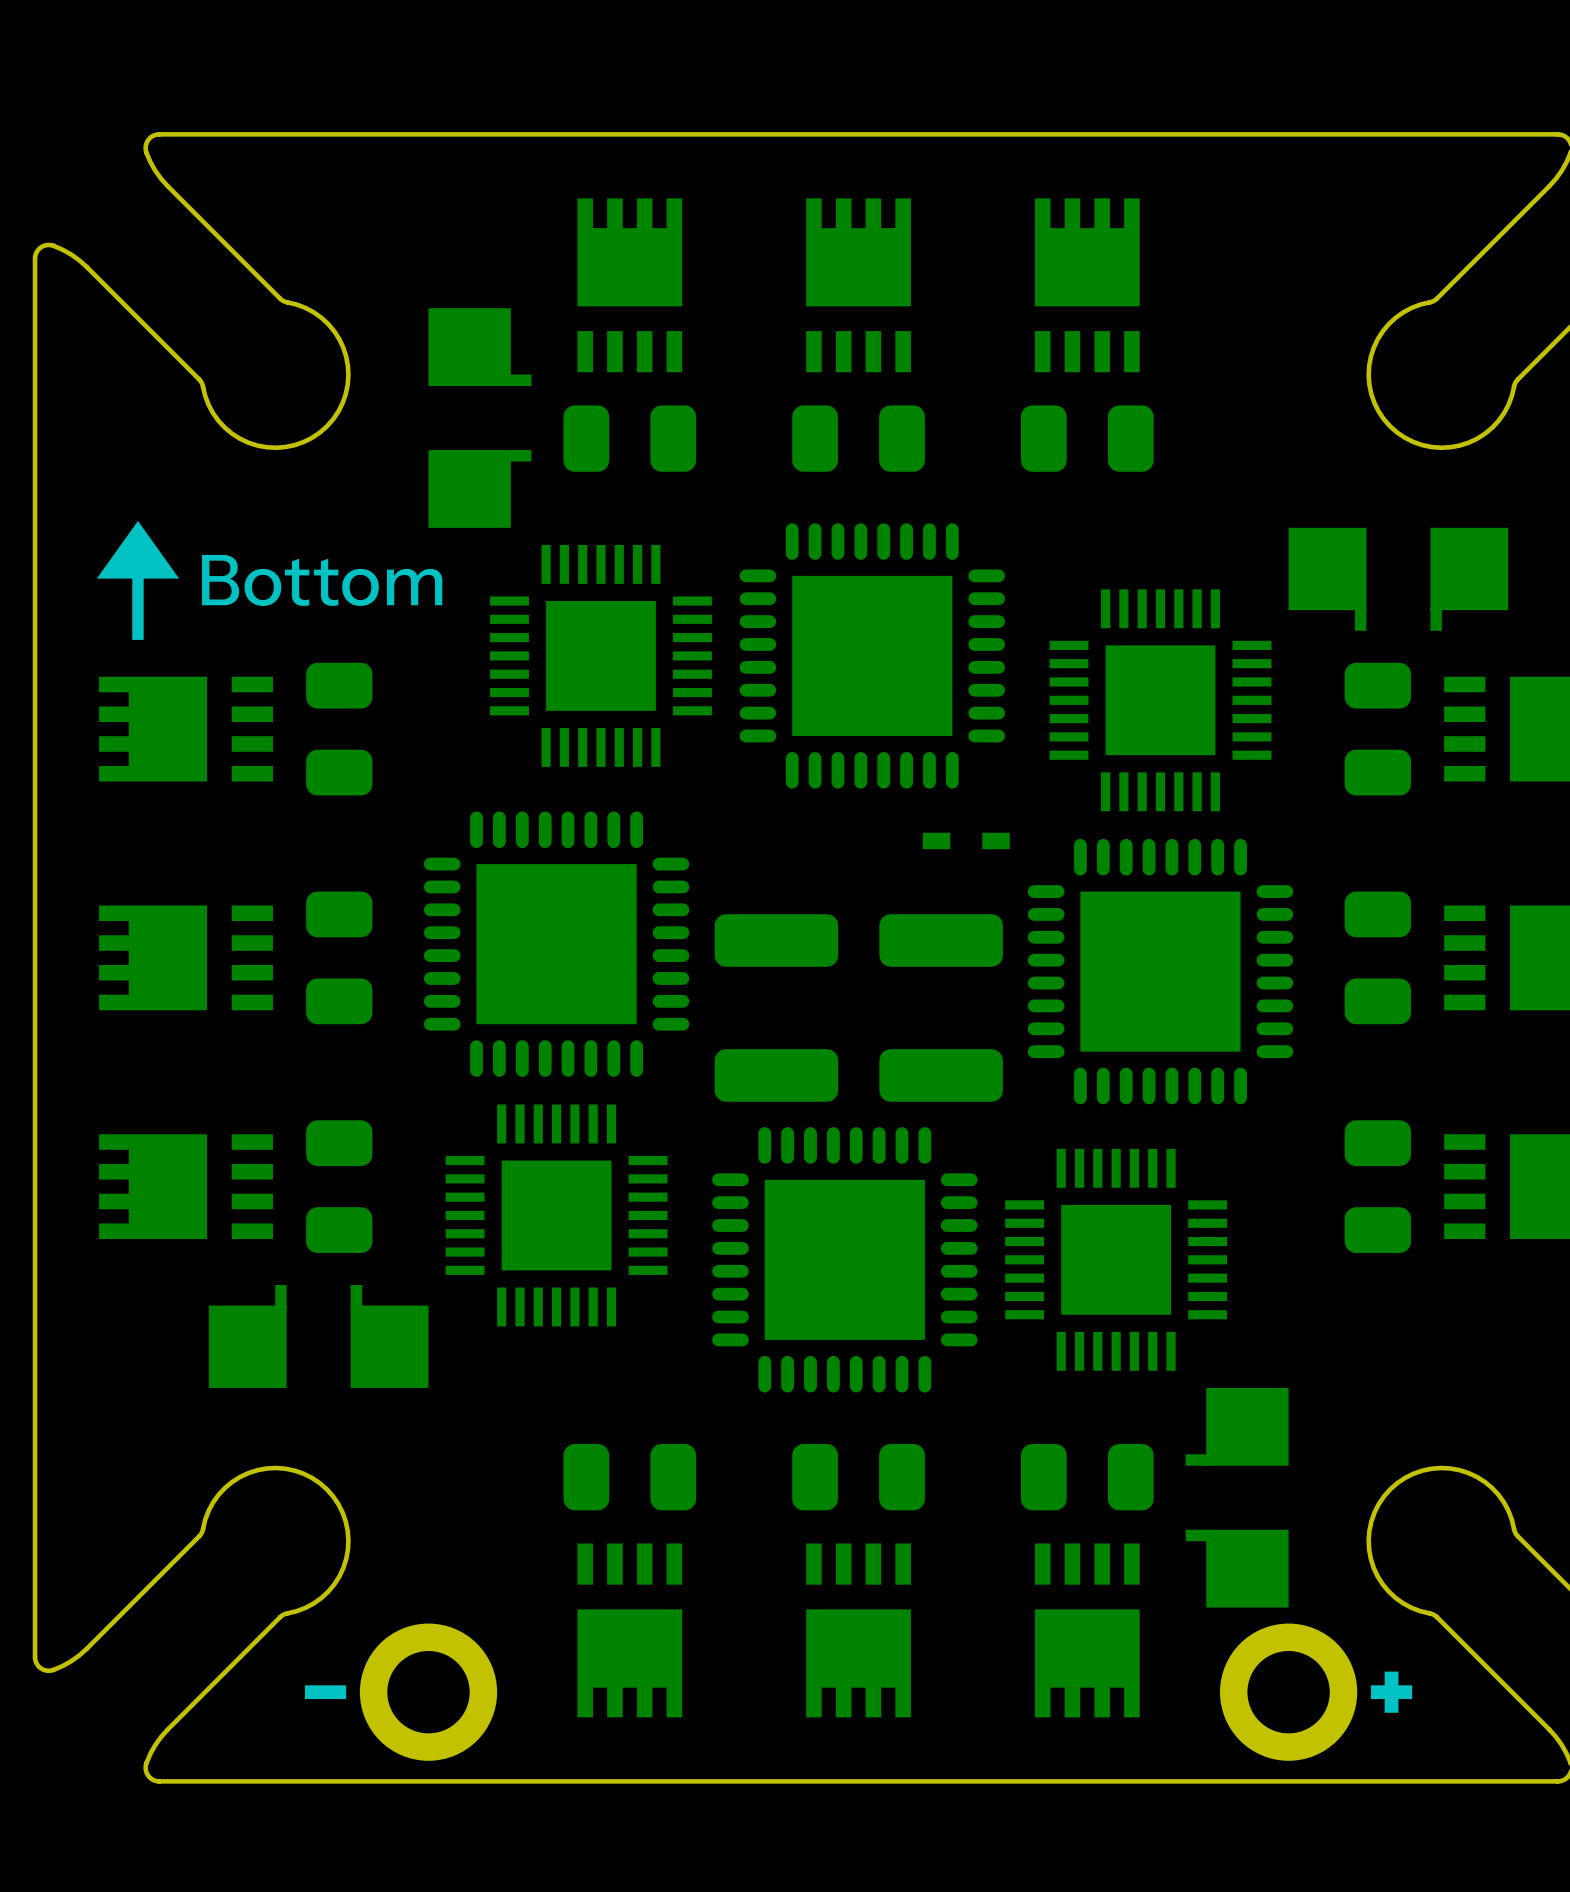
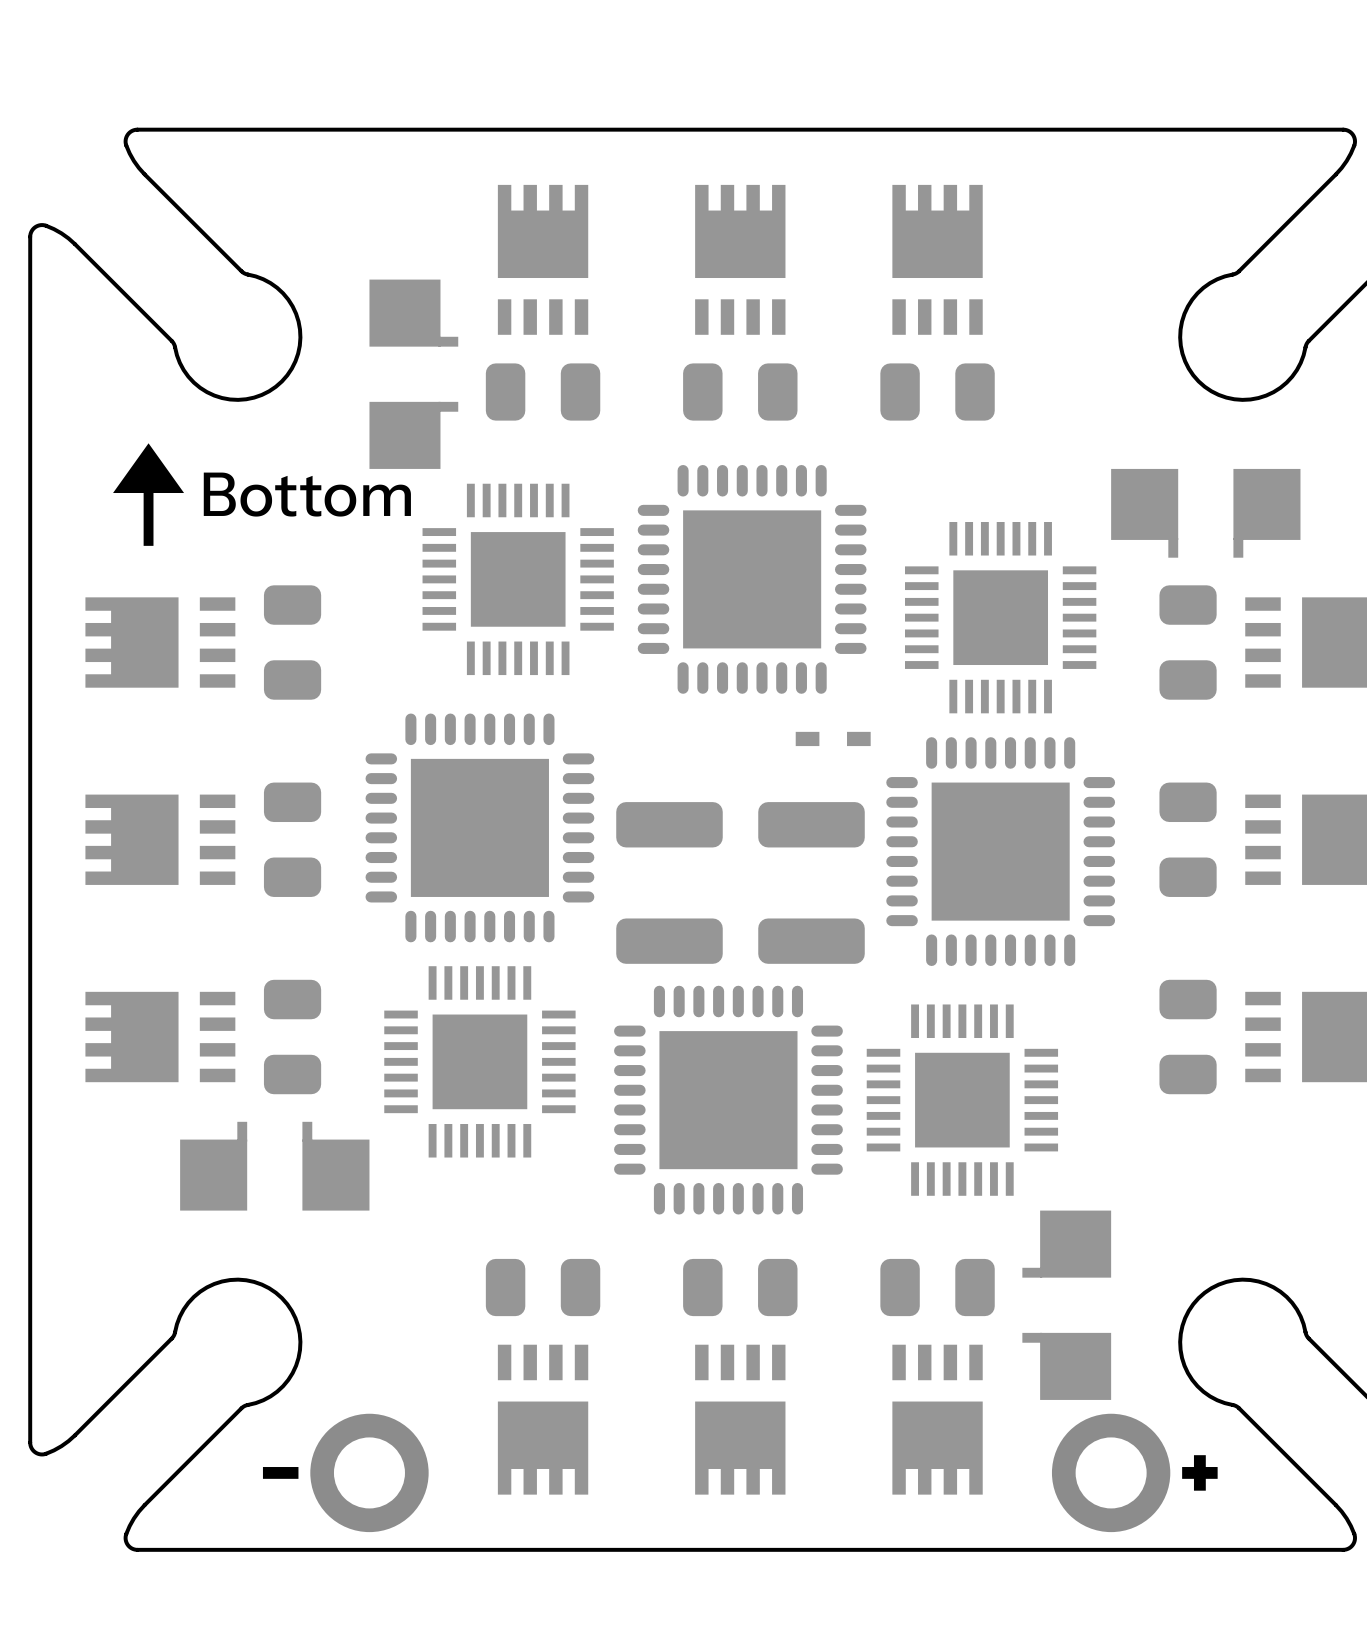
drawing: none -> [240, 475, 357, 517]
drawing: [244, 558, 379, 606] -> none
drawing position: (137, 580) -> (148, 494)
drawing position: (220, 580) -> (219, 494)
drawing position: (414, 587) -> (387, 500)

